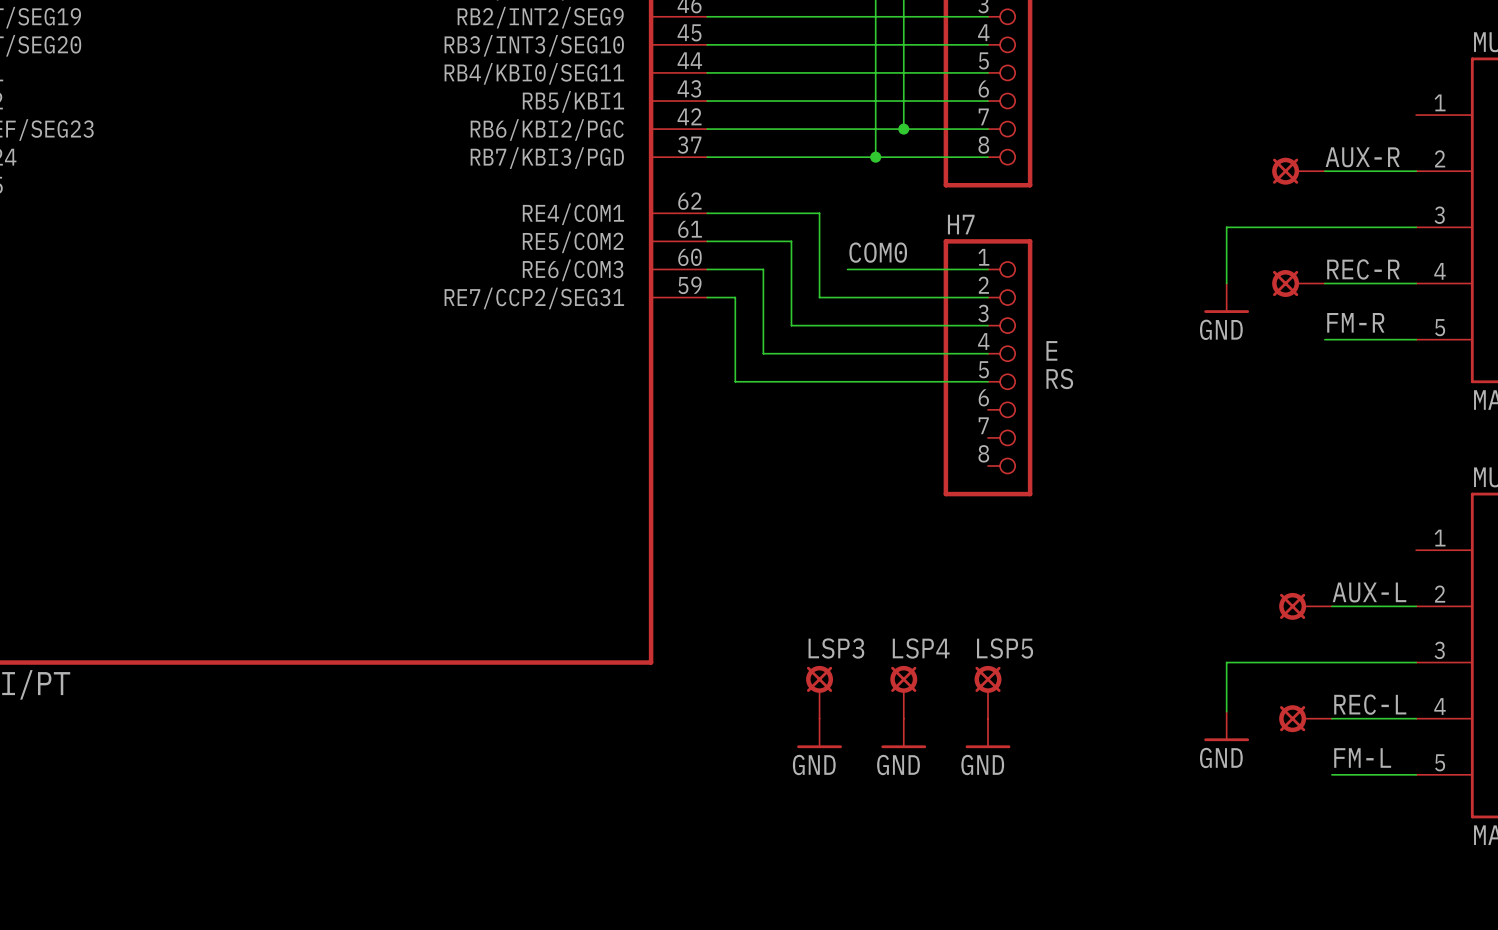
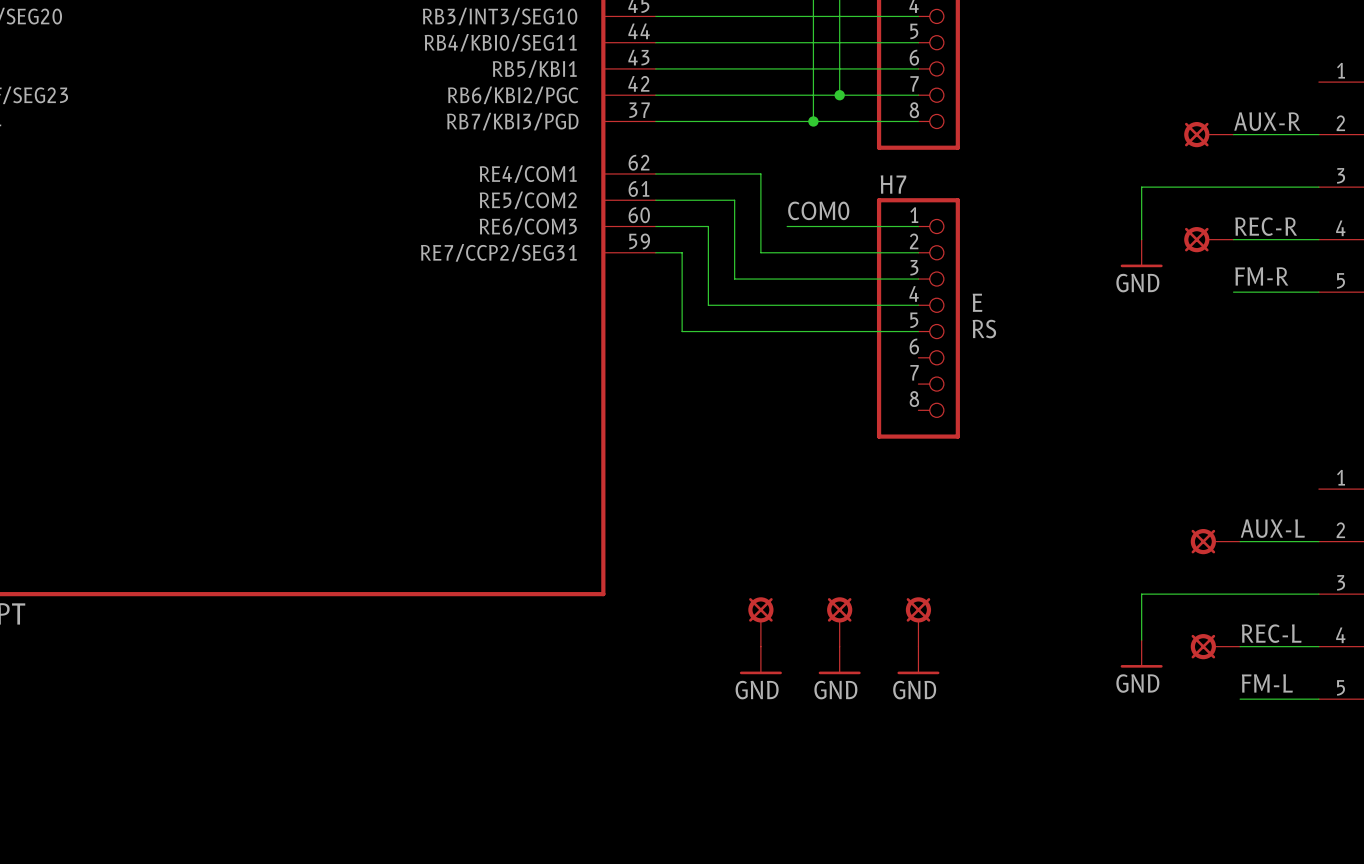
LSP3 name: LSP3 (836, 648) -> none
LSP4 name: LSP4 (921, 648) -> none
LSP5 name: LSP5 (1005, 648) -> none

